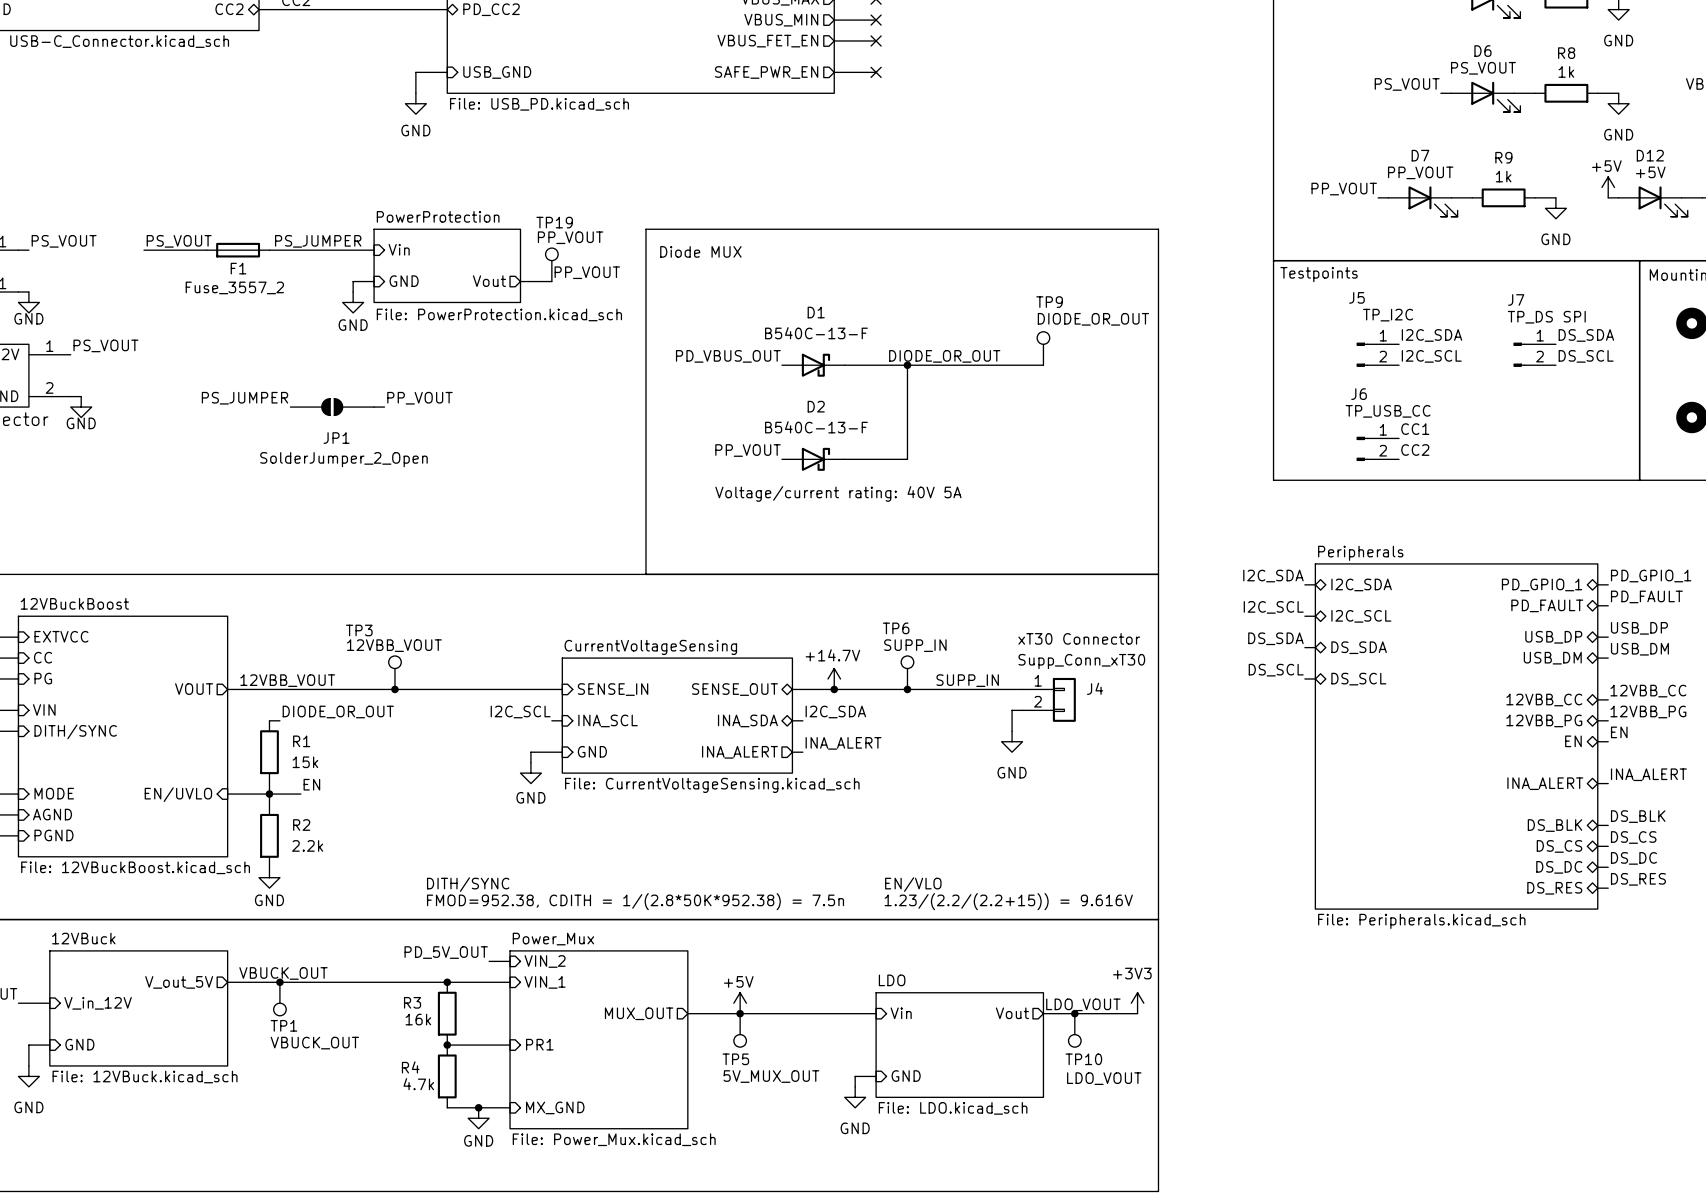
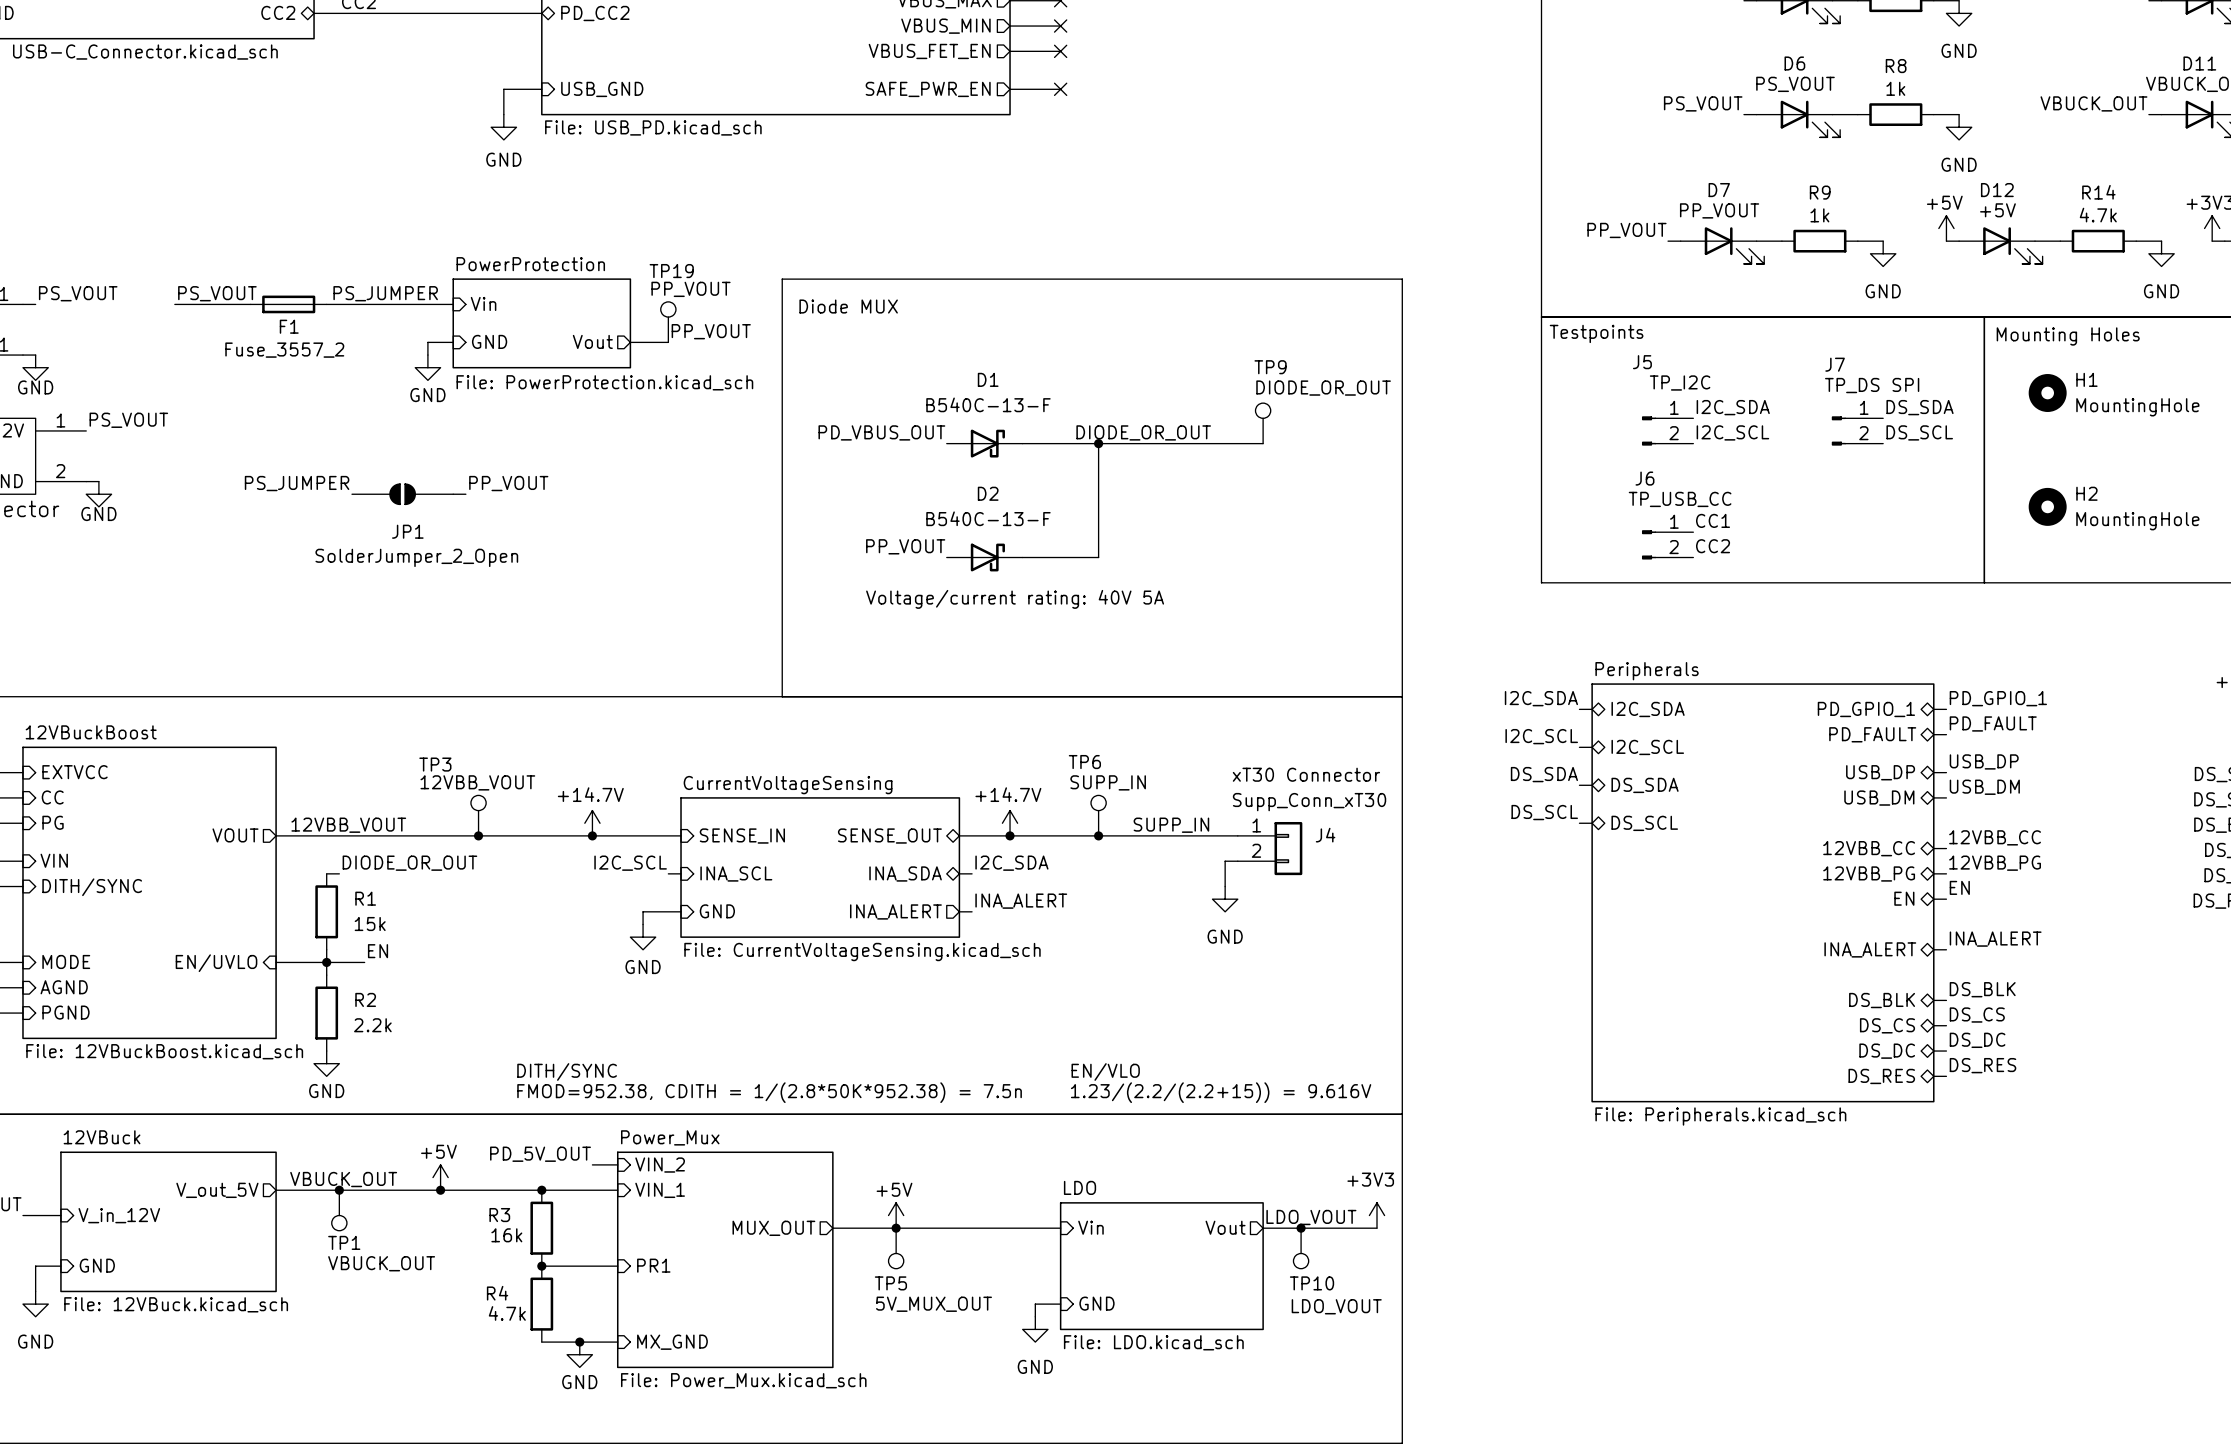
power symbol: none -> +14.7V (592, 823)
junction: none -> (592, 835)
power symbol: none -> +5V (440, 1177)
junction: none -> (440, 1190)

